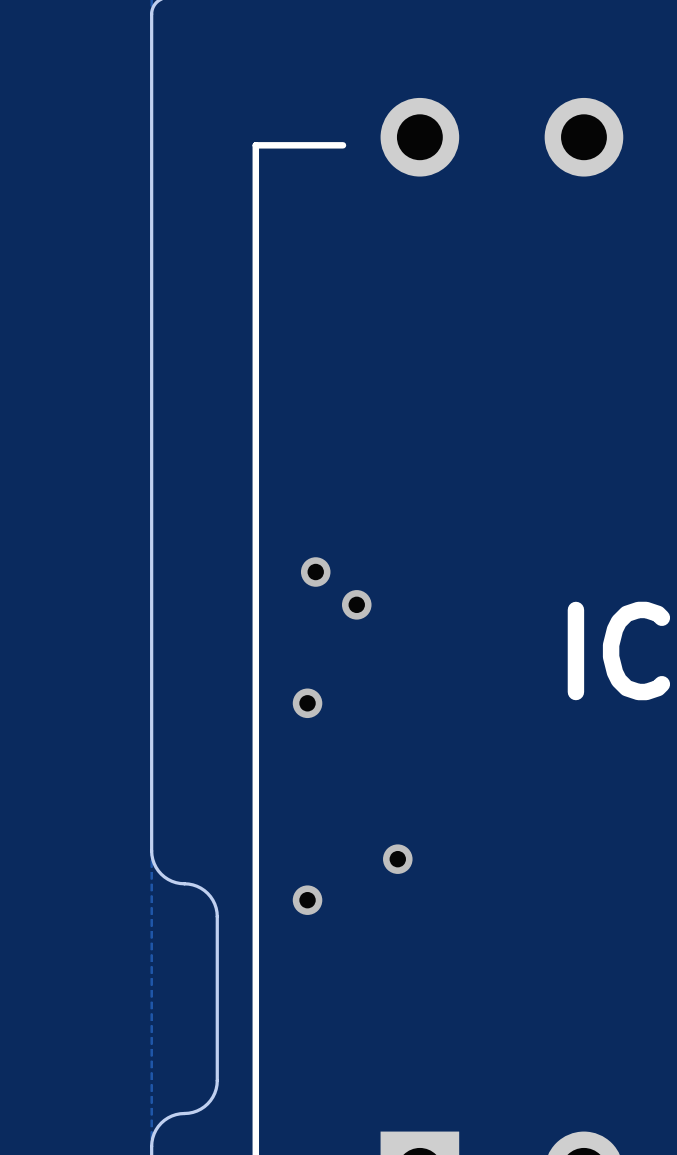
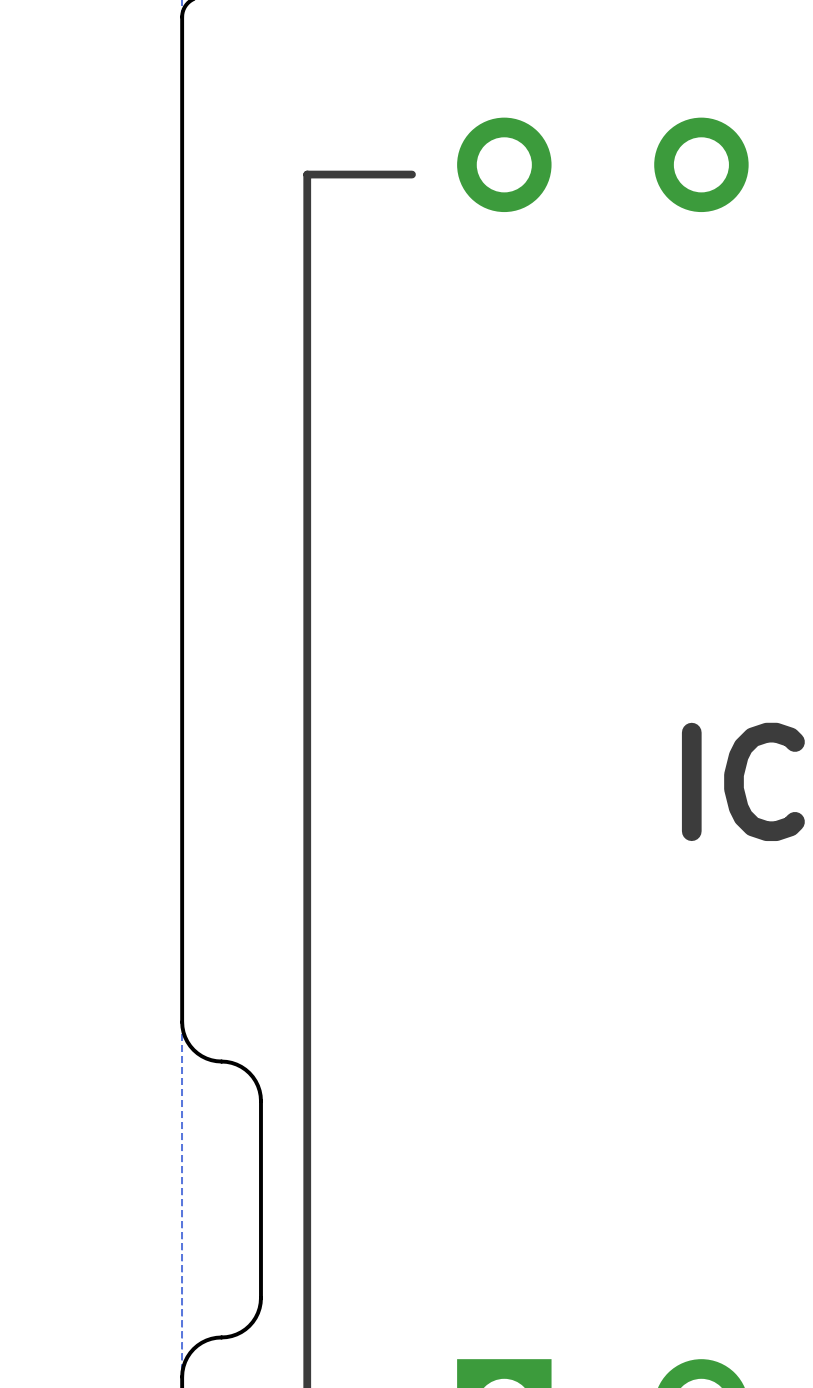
via: (315, 572) -> none
via: (356, 604) -> none
via: (307, 703) -> none
via: (397, 859) -> none
via: (307, 900) -> none

